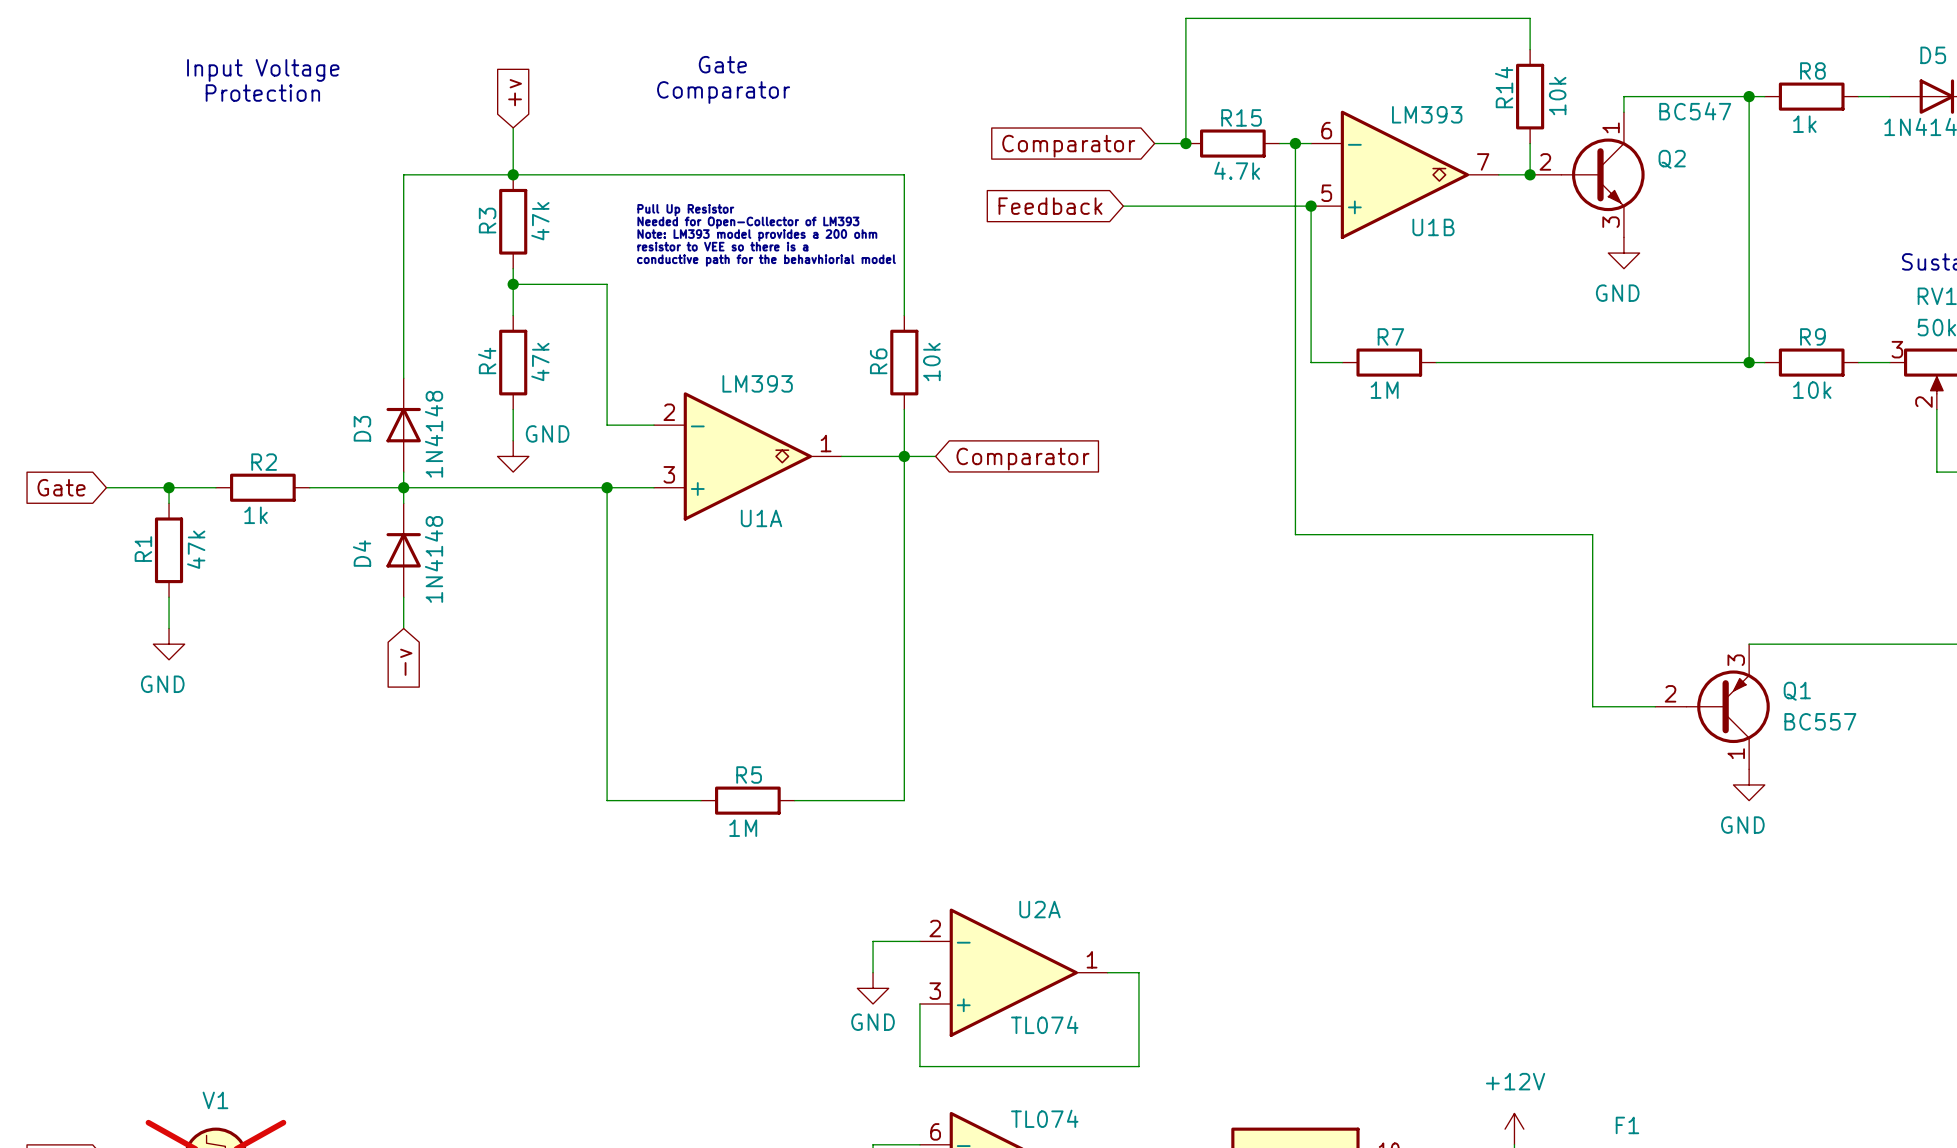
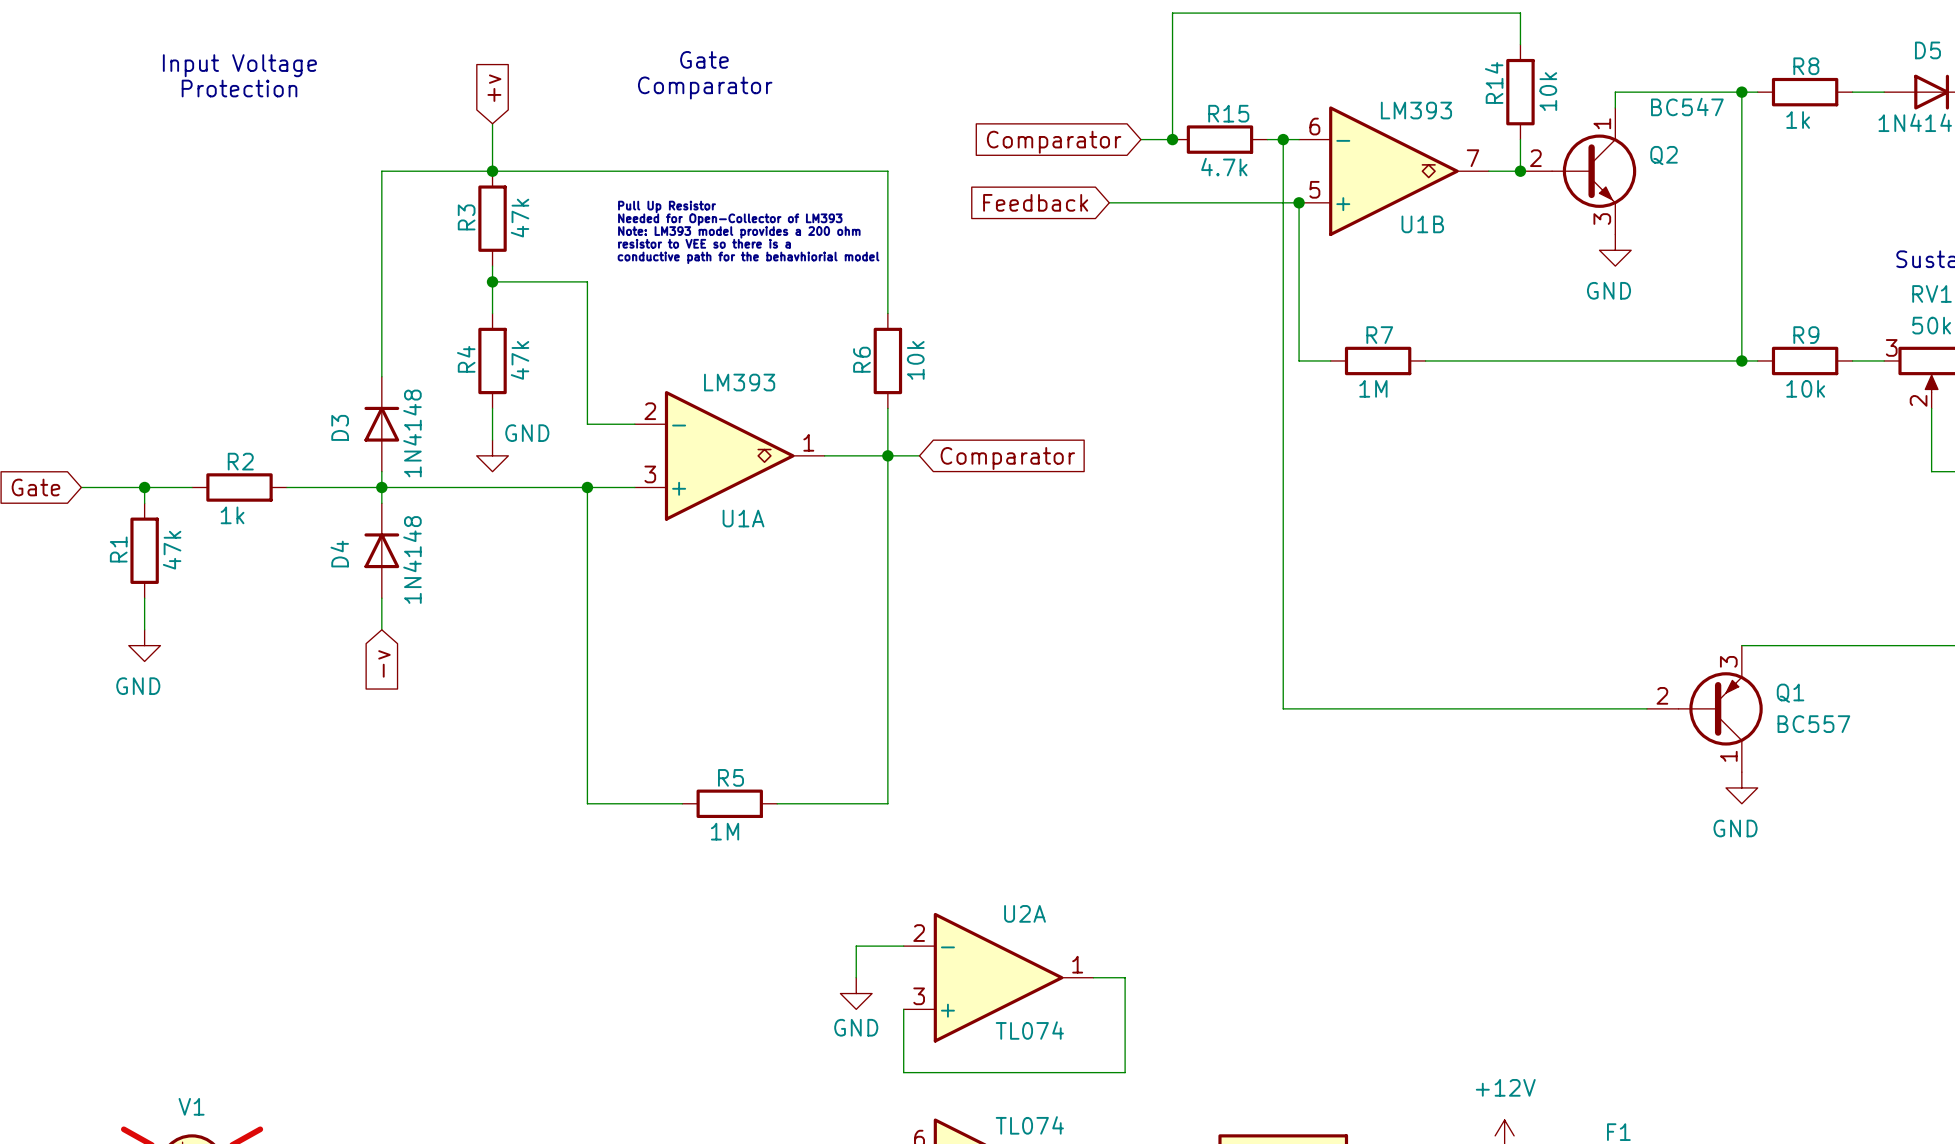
wire: (1295, 534) (1592, 534) (1592, 706) -> (1283, 534) (1283, 708) (1583, 708)

